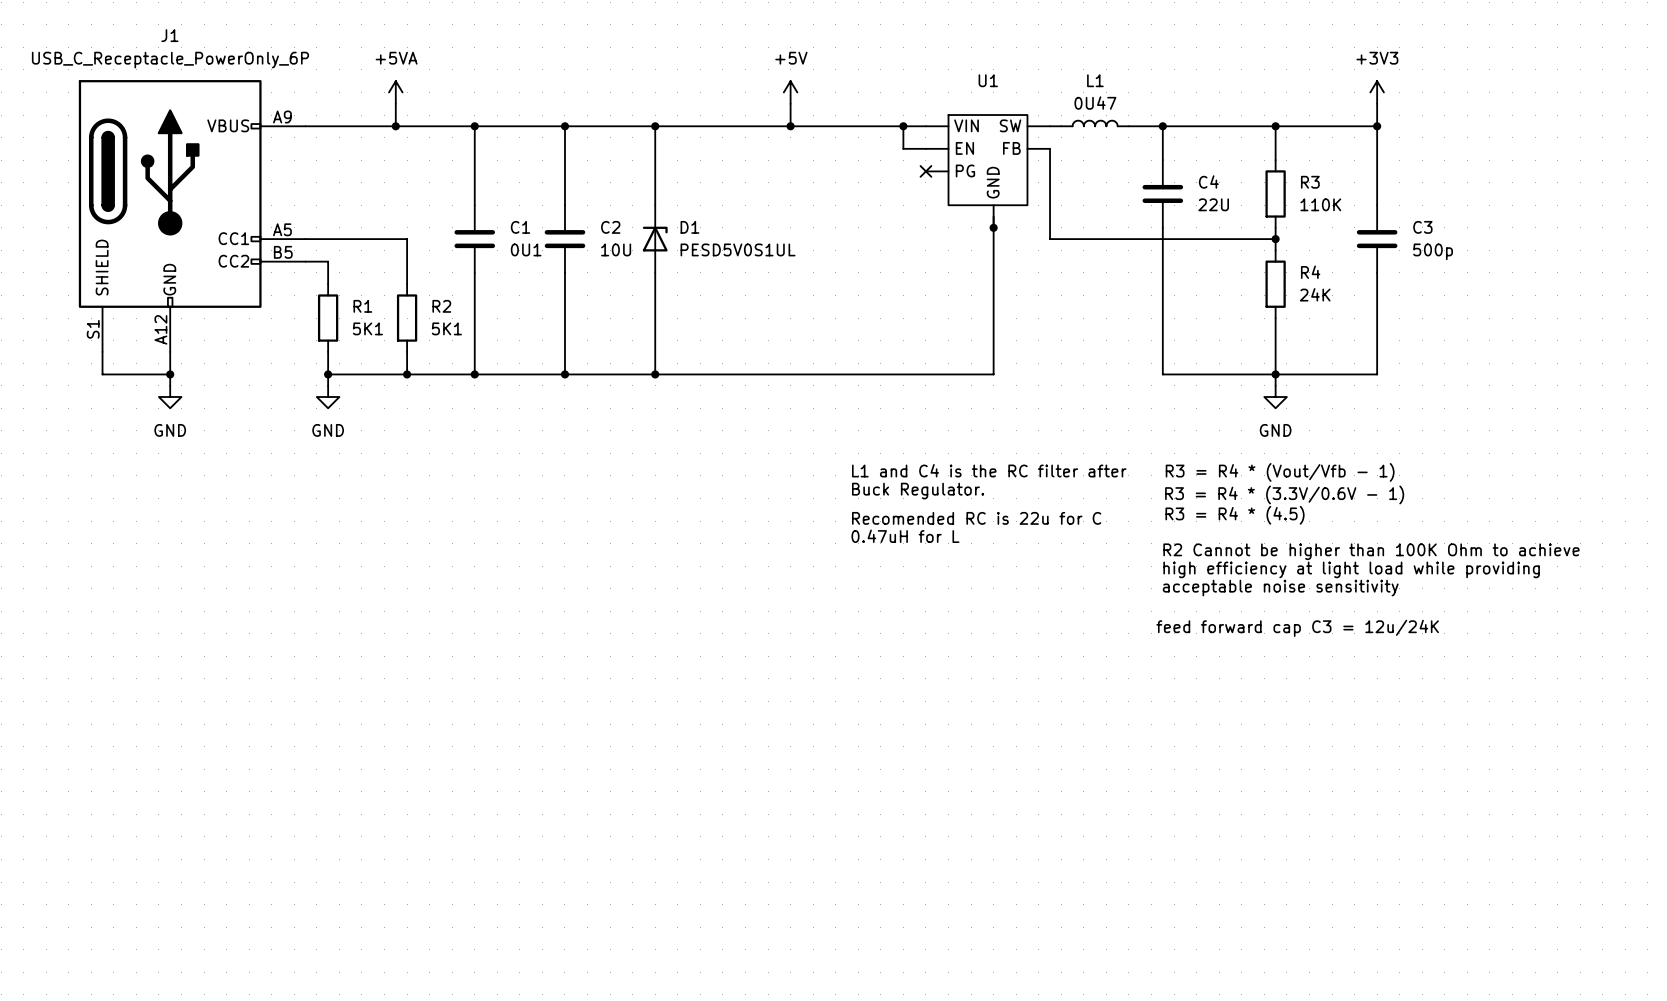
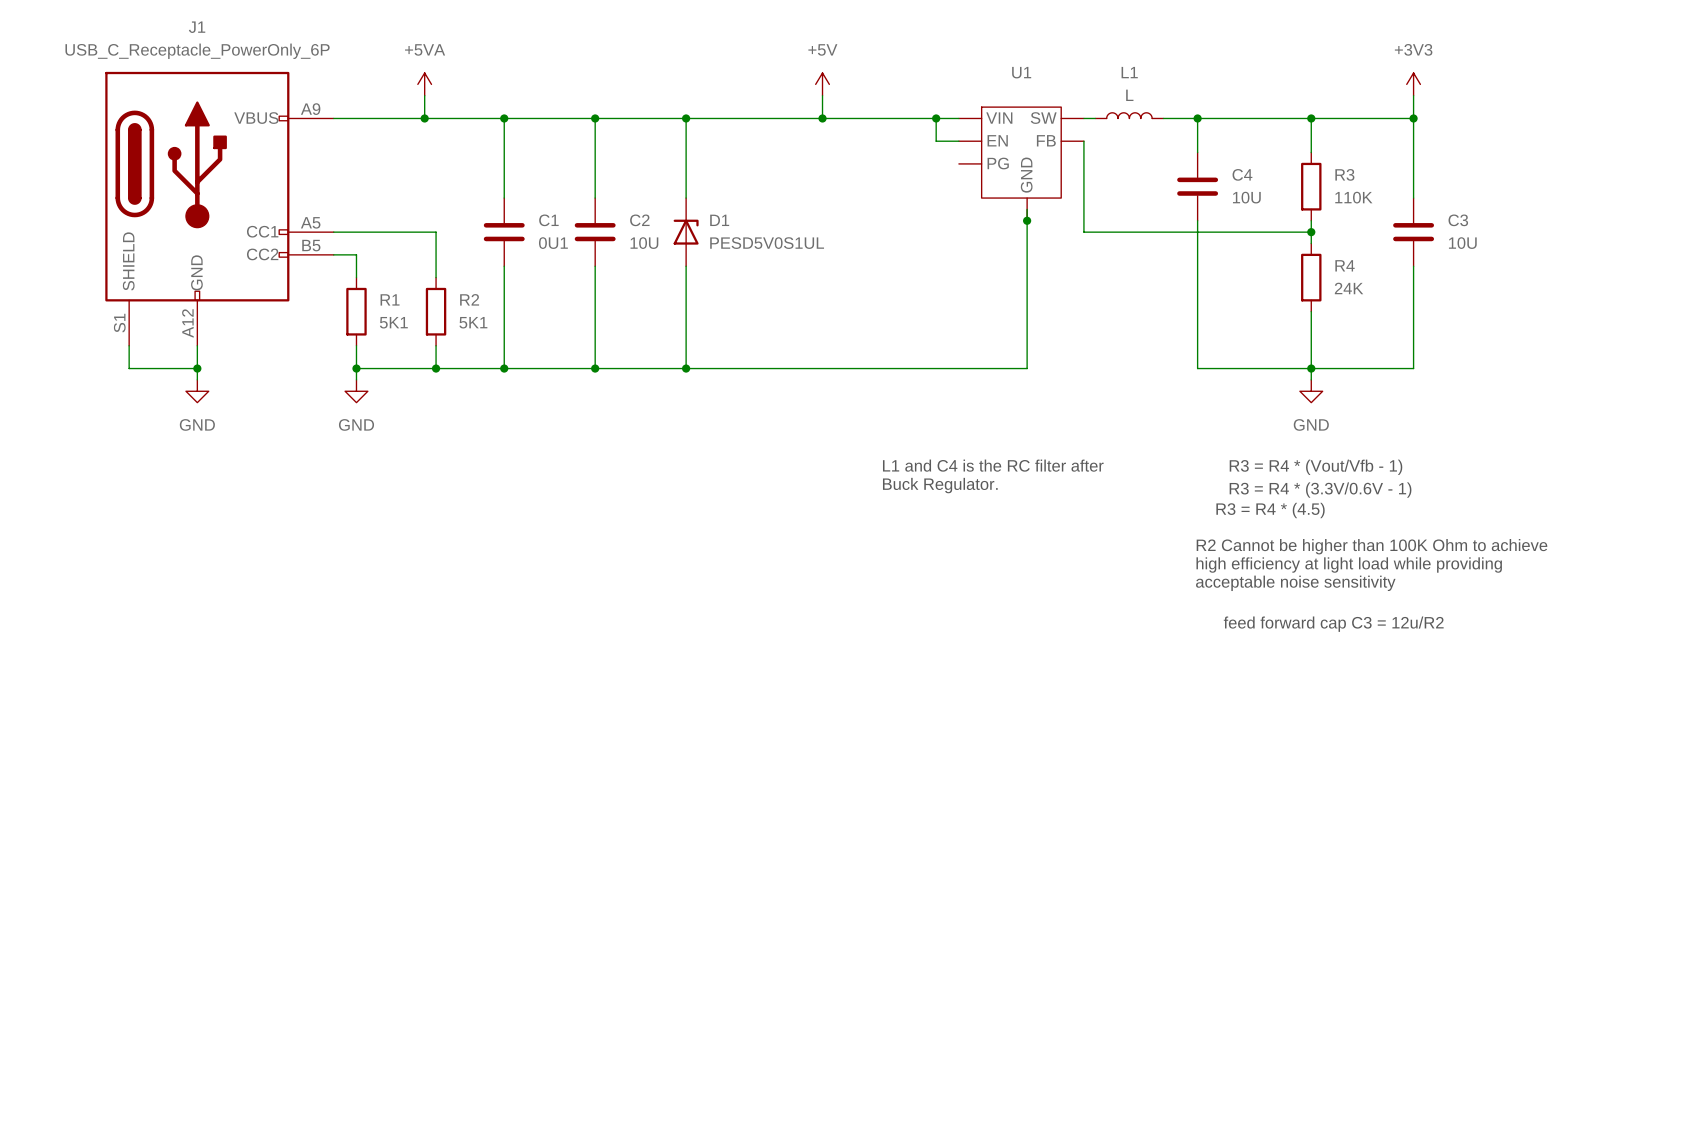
L1 value: 0U47 (1095, 103) -> L (1129, 95)
no-connect mark: (925, 171) -> none
C4 value: 22U (1213, 204) -> 10U (1246, 197)
C3 value: 500p (1433, 251) -> 10U (1462, 243)
text: Recomended RC is 22u for C (976, 518) -> none
text: 0.47uH for L (905, 536) -> none
text: feed forward cap C3 = 12u/24K (1297, 628) -> feed forward cap C3 = 12u/R2 (1333, 624)

